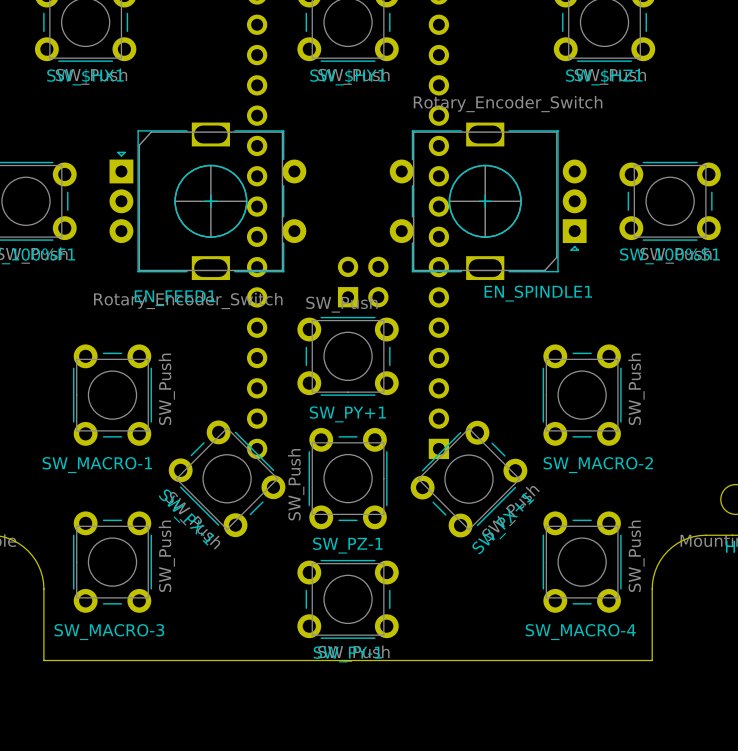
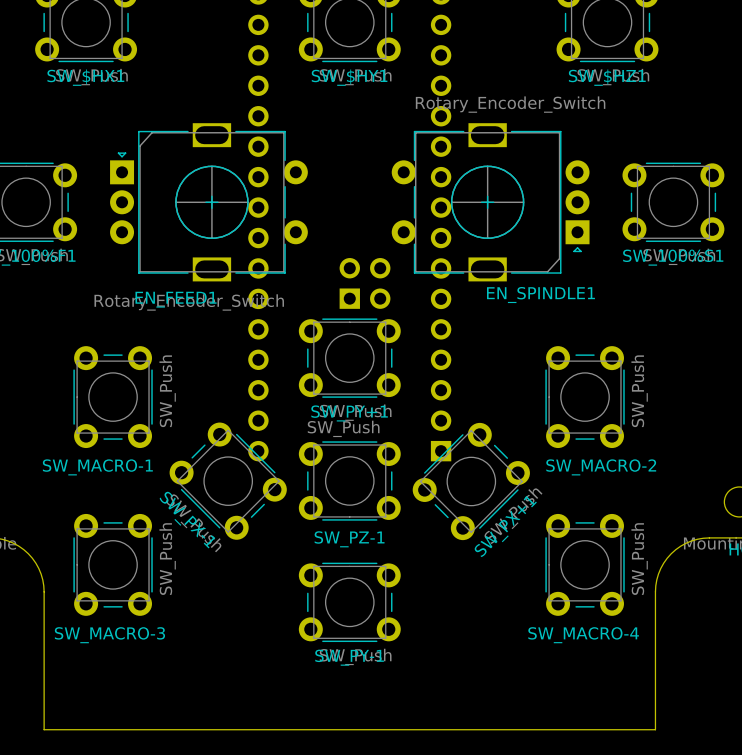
SW_PY+1 rotation: 0° (348, 356) -> 180° (349, 358)
SW_PZ-1 rotation: 0° (348, 478) -> 90° clockwise (349, 480)
board edge: (43, 660) (652, 660) -> (44, 663) (44, 729) (655, 729) (655, 663)

